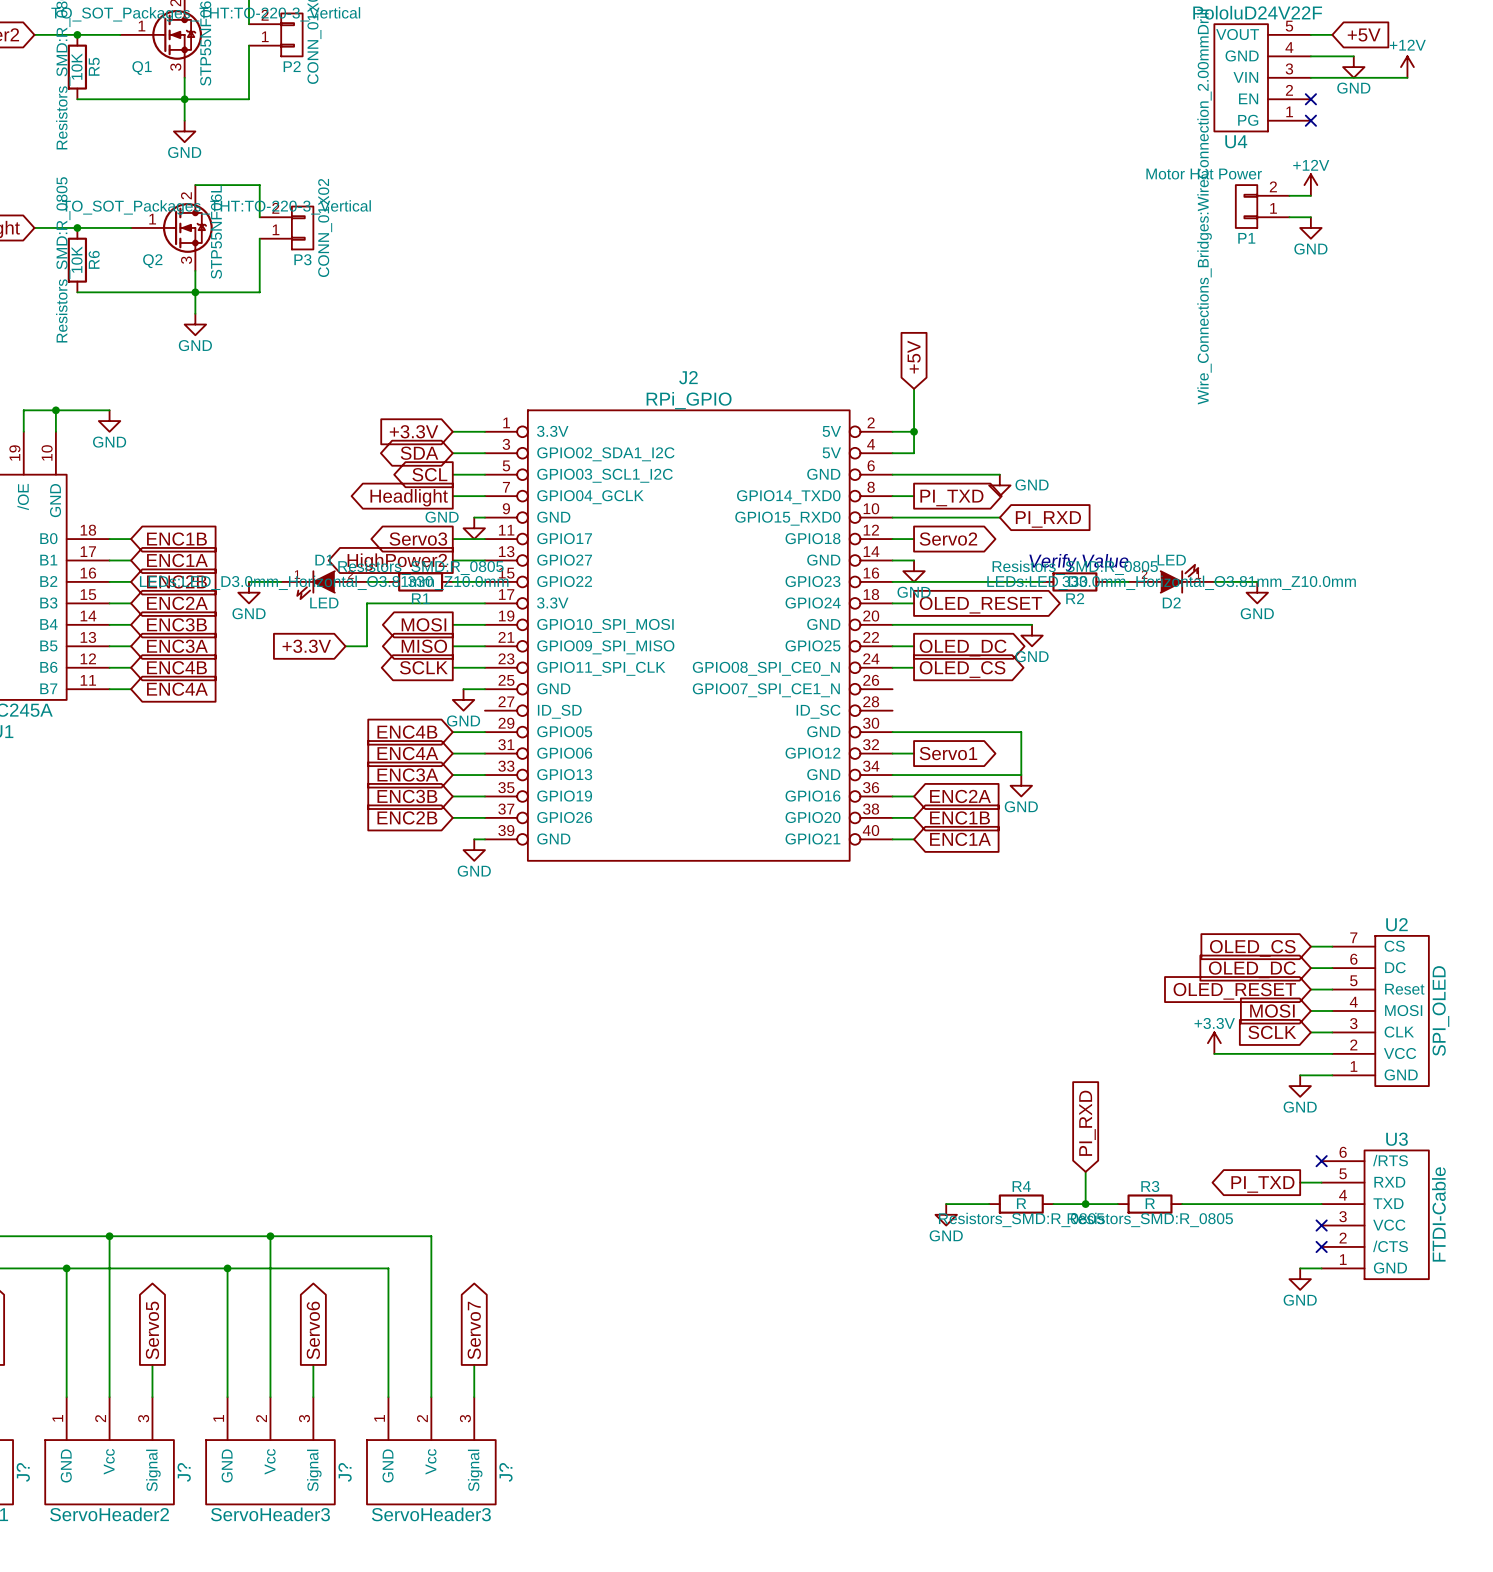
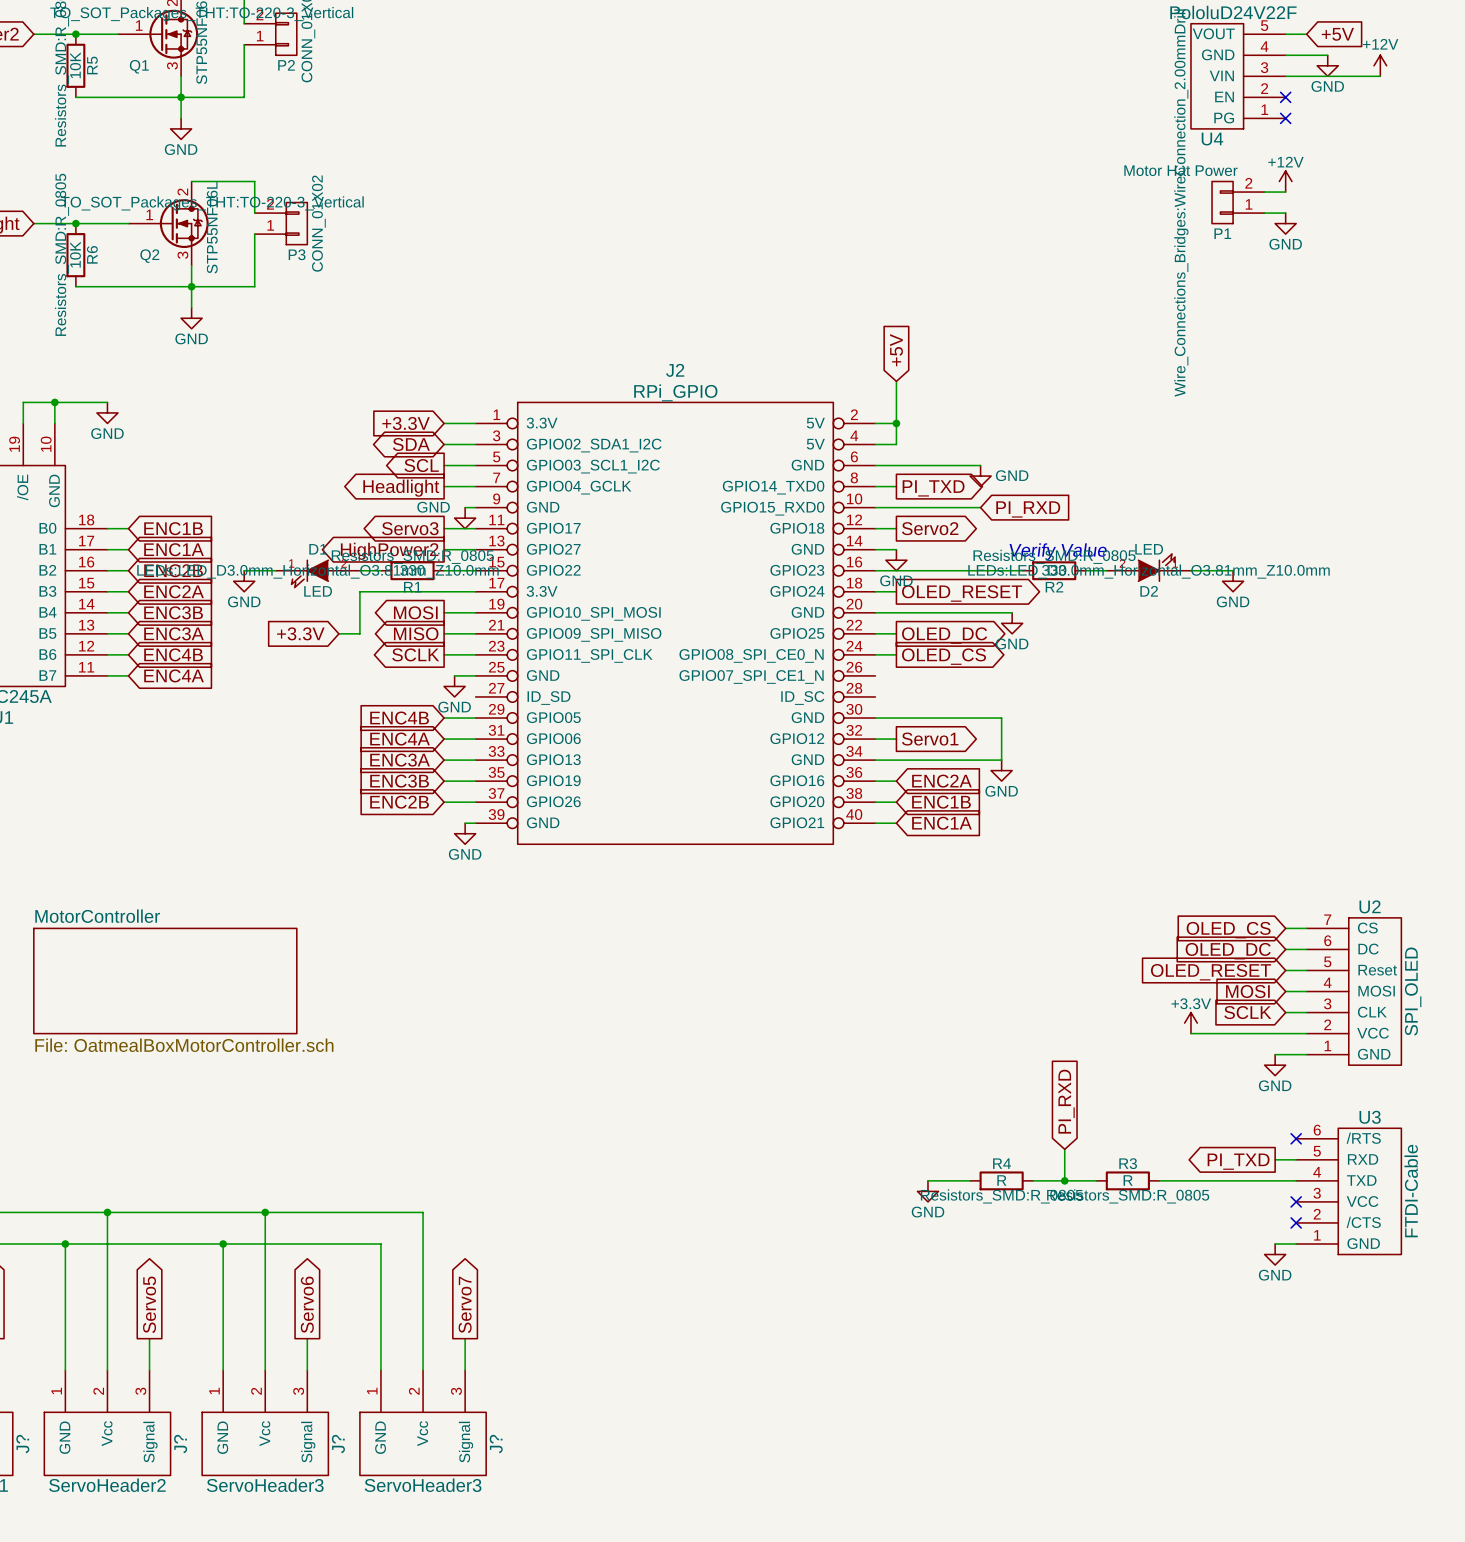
sheet MotorController: none -> File: OatmealBoxMotorController.sch (165, 981)

